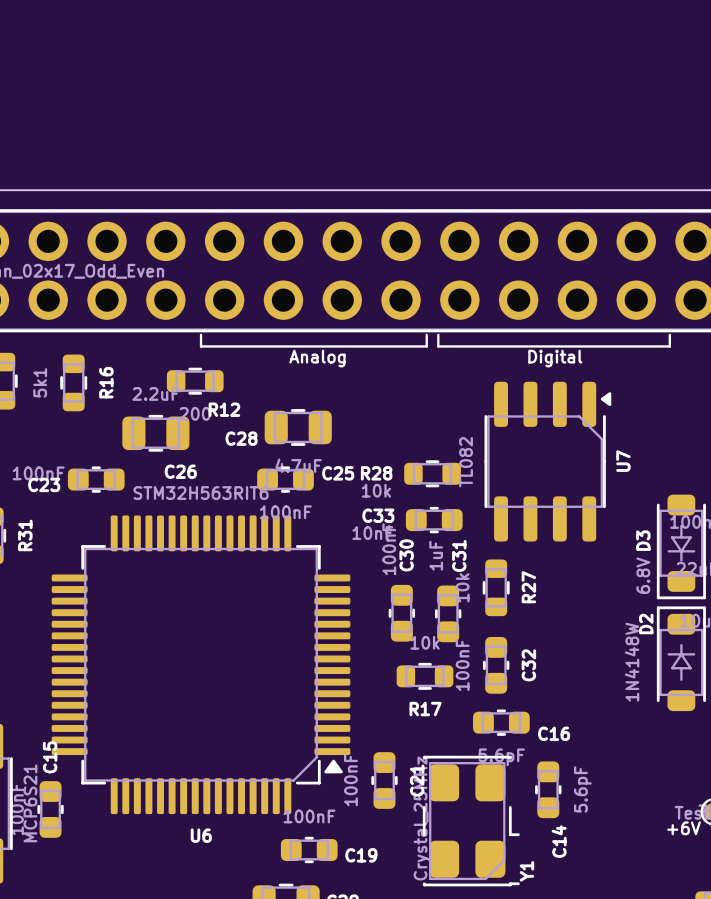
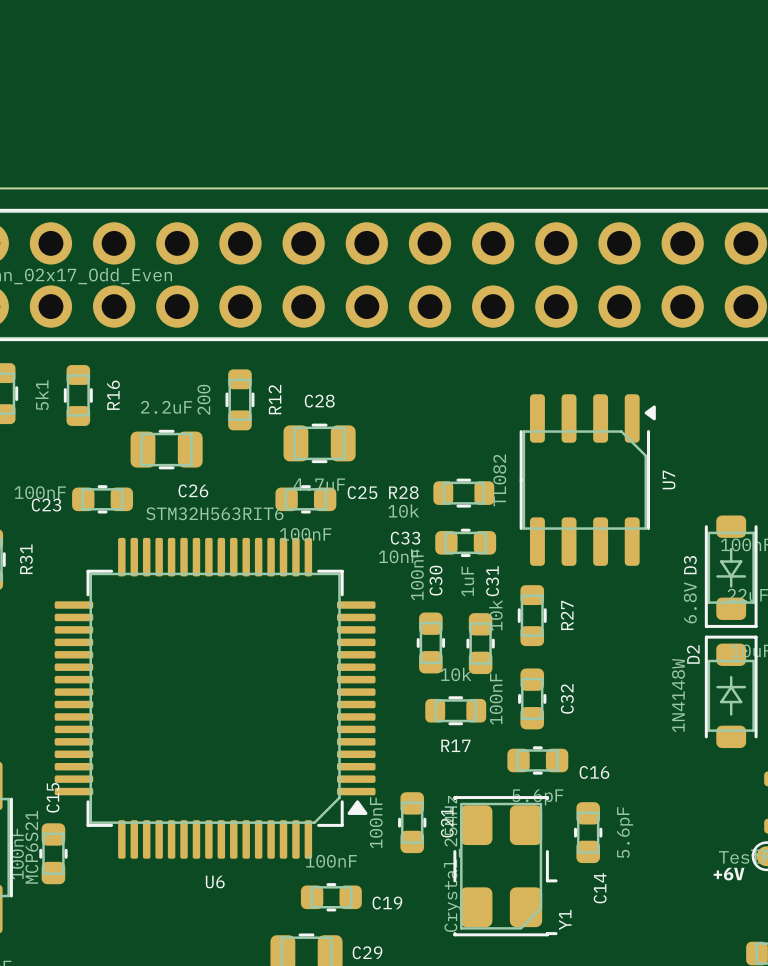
line: (201, 334) (201, 346) (426, 346) (426, 334) -> none
line: (438, 334) (438, 346) (669, 346) (669, 334) -> none
text: Analog (317, 358) -> none
text: Digital (555, 358) -> none
R12 rotation: 0° (195, 381) -> 90° clockwise (239, 399)
C28 name position: C28 (241, 438) -> C28 (319, 401)

